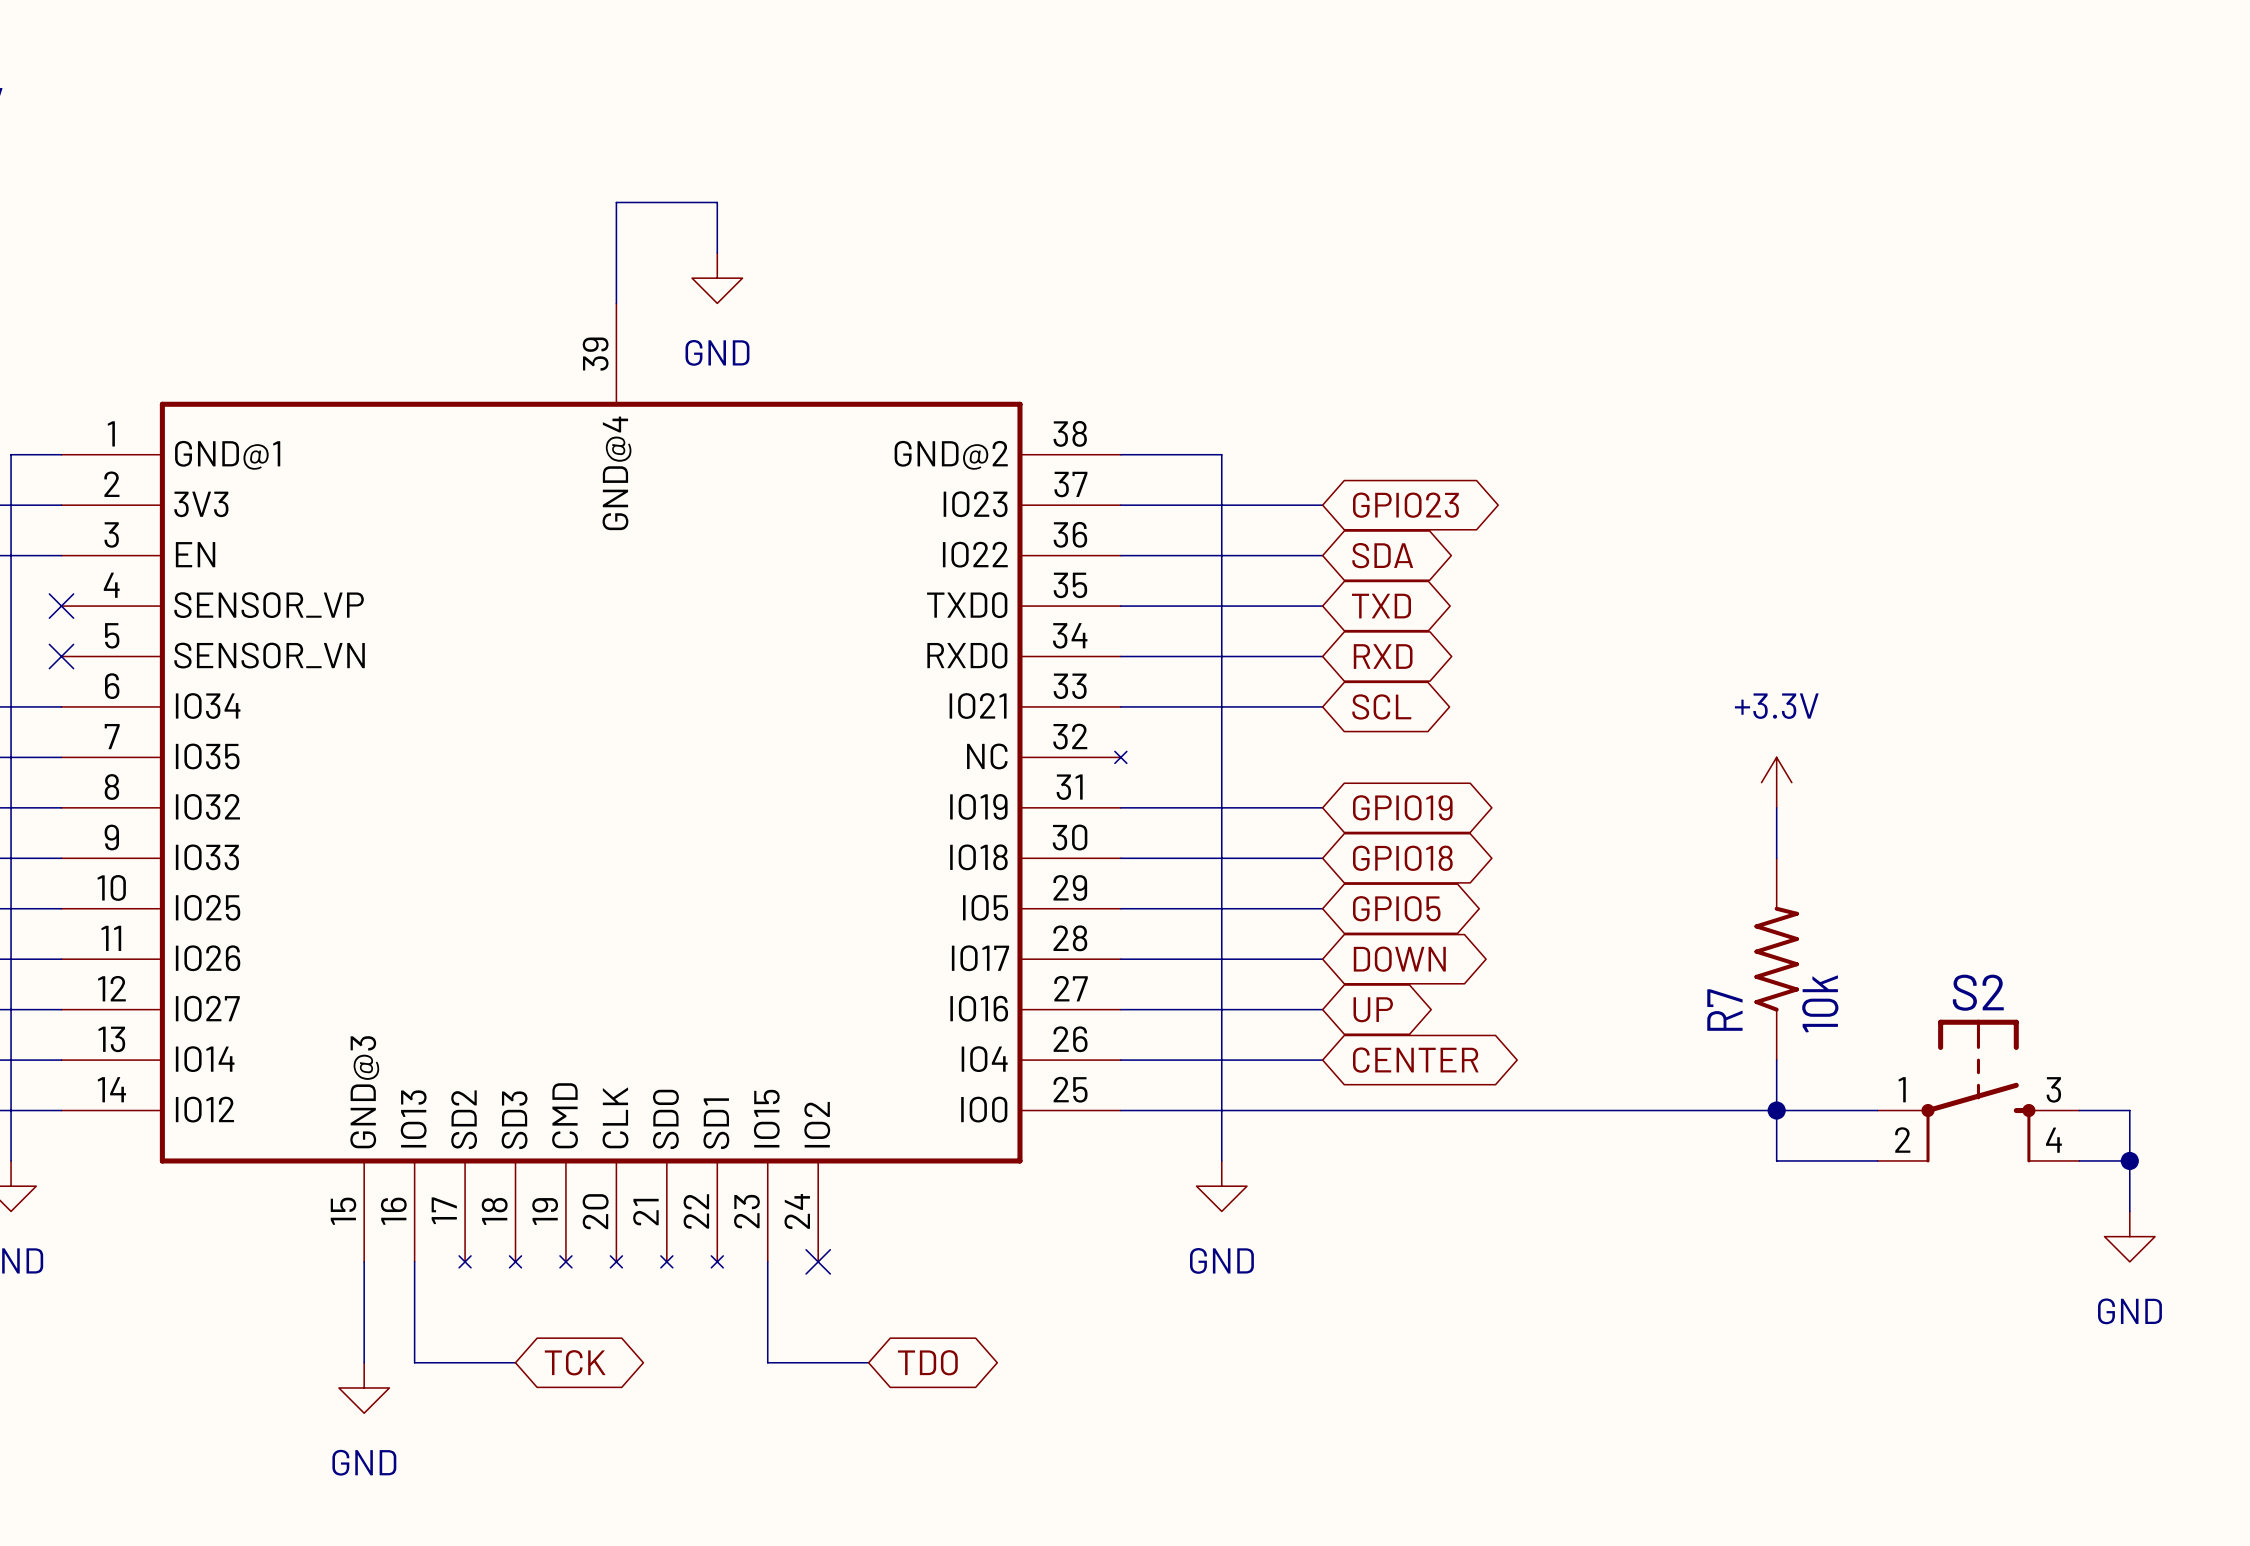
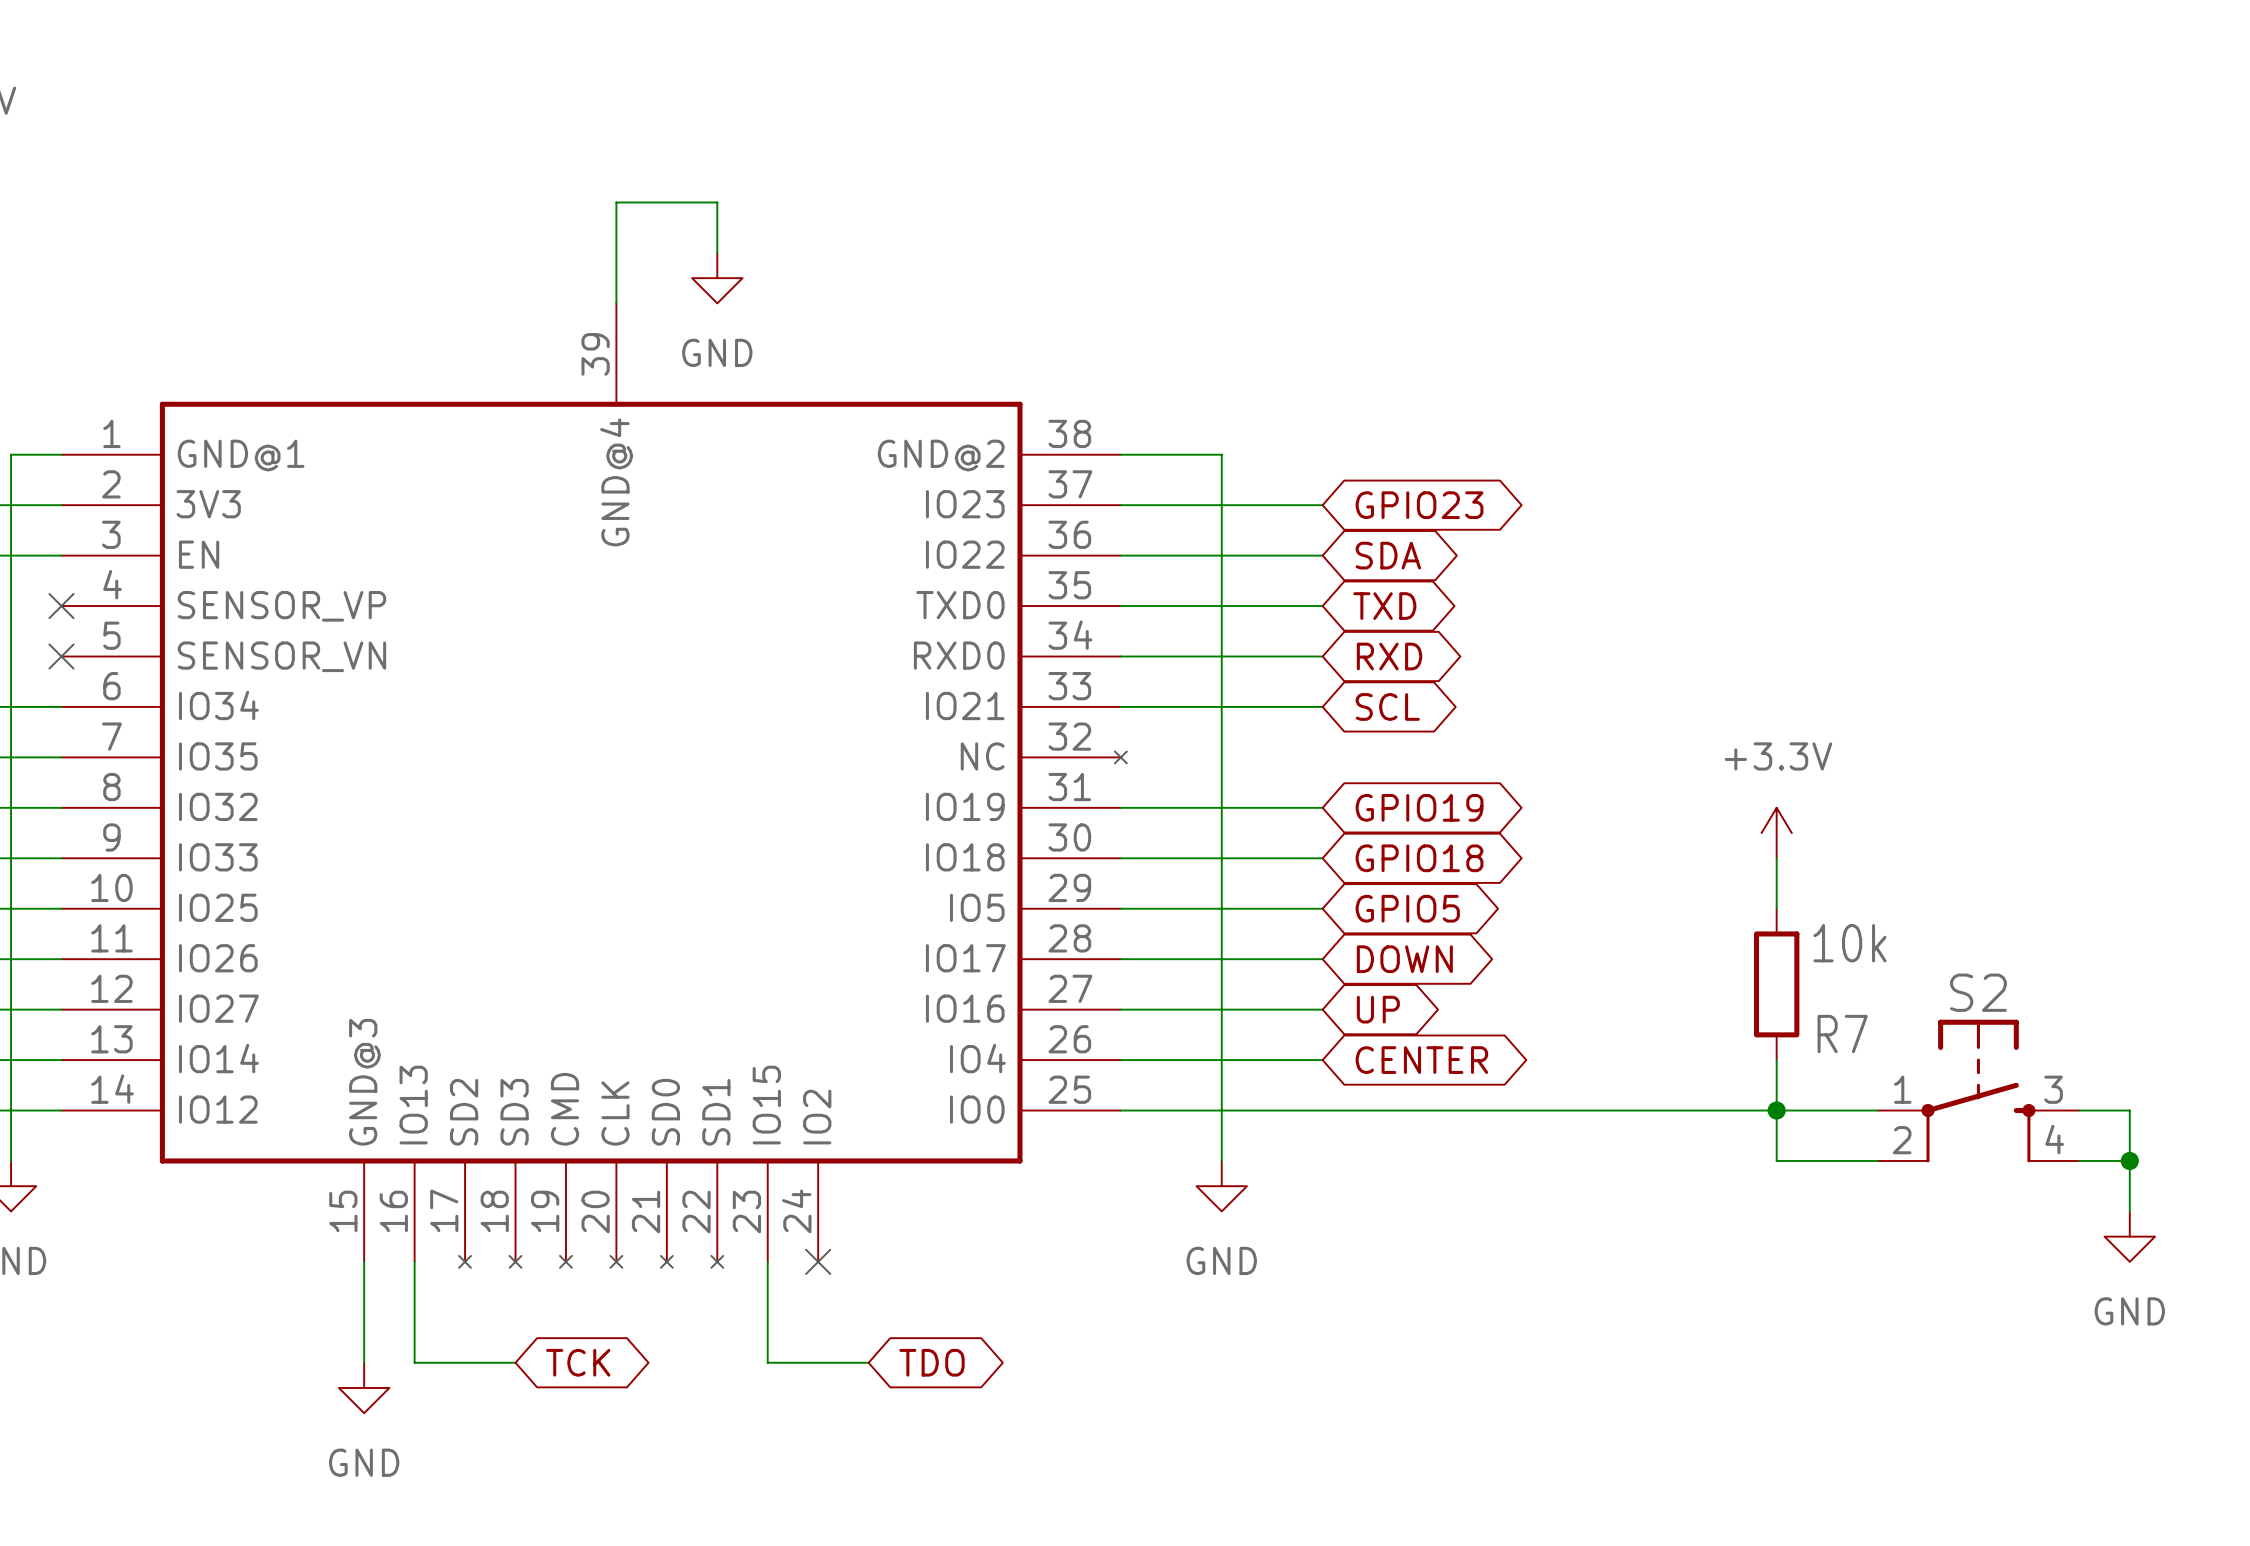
power symbol position: +3.3V (1776, 782) -> +3.3V (1776, 833)
R7 symbol: [1754, 858, 1799, 1061] -> [1753, 908, 1800, 1061]
R7 value position: 10k (1820, 1003) -> 10k (1849, 943)
R7 name position: R7 (1724, 1010) -> R7 (1842, 1034)

